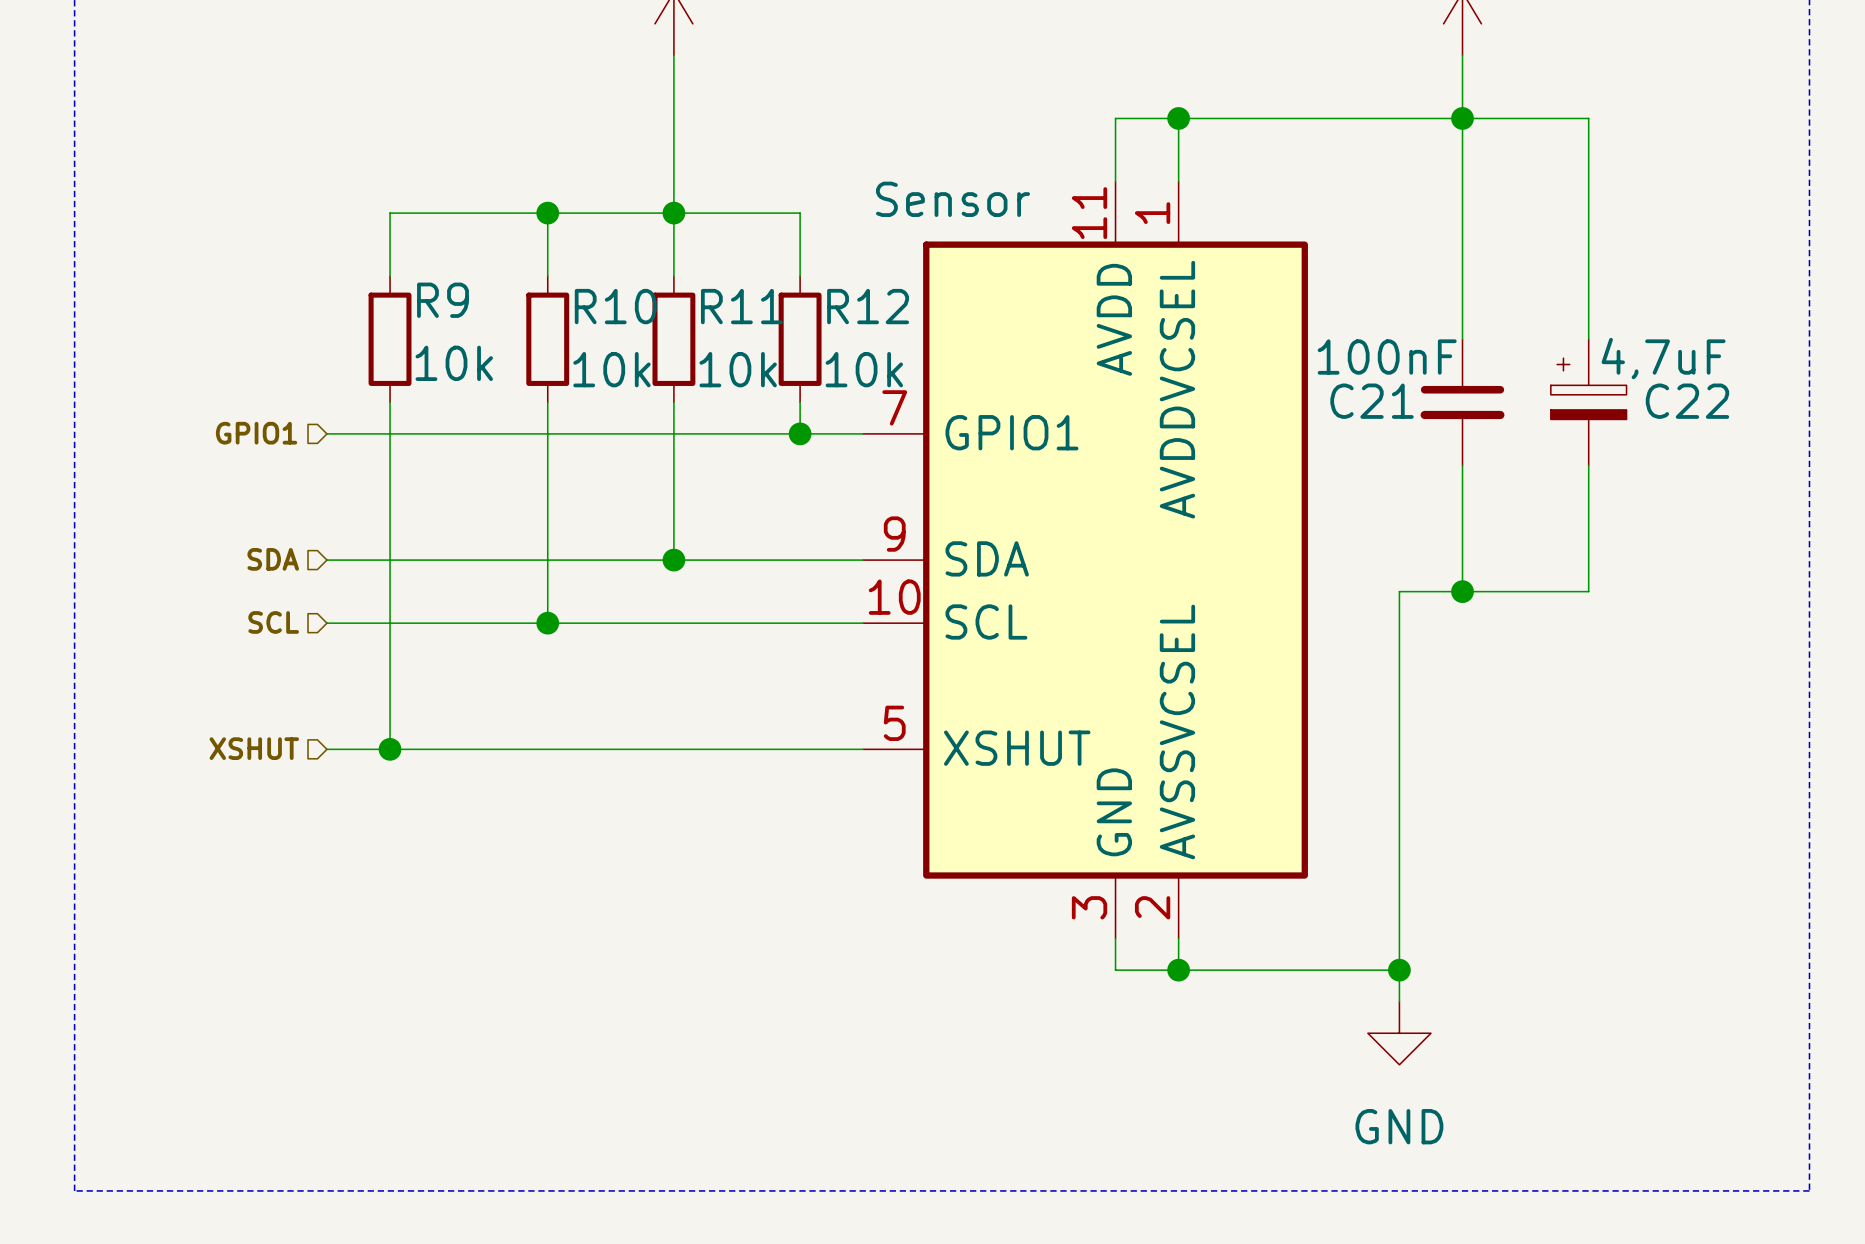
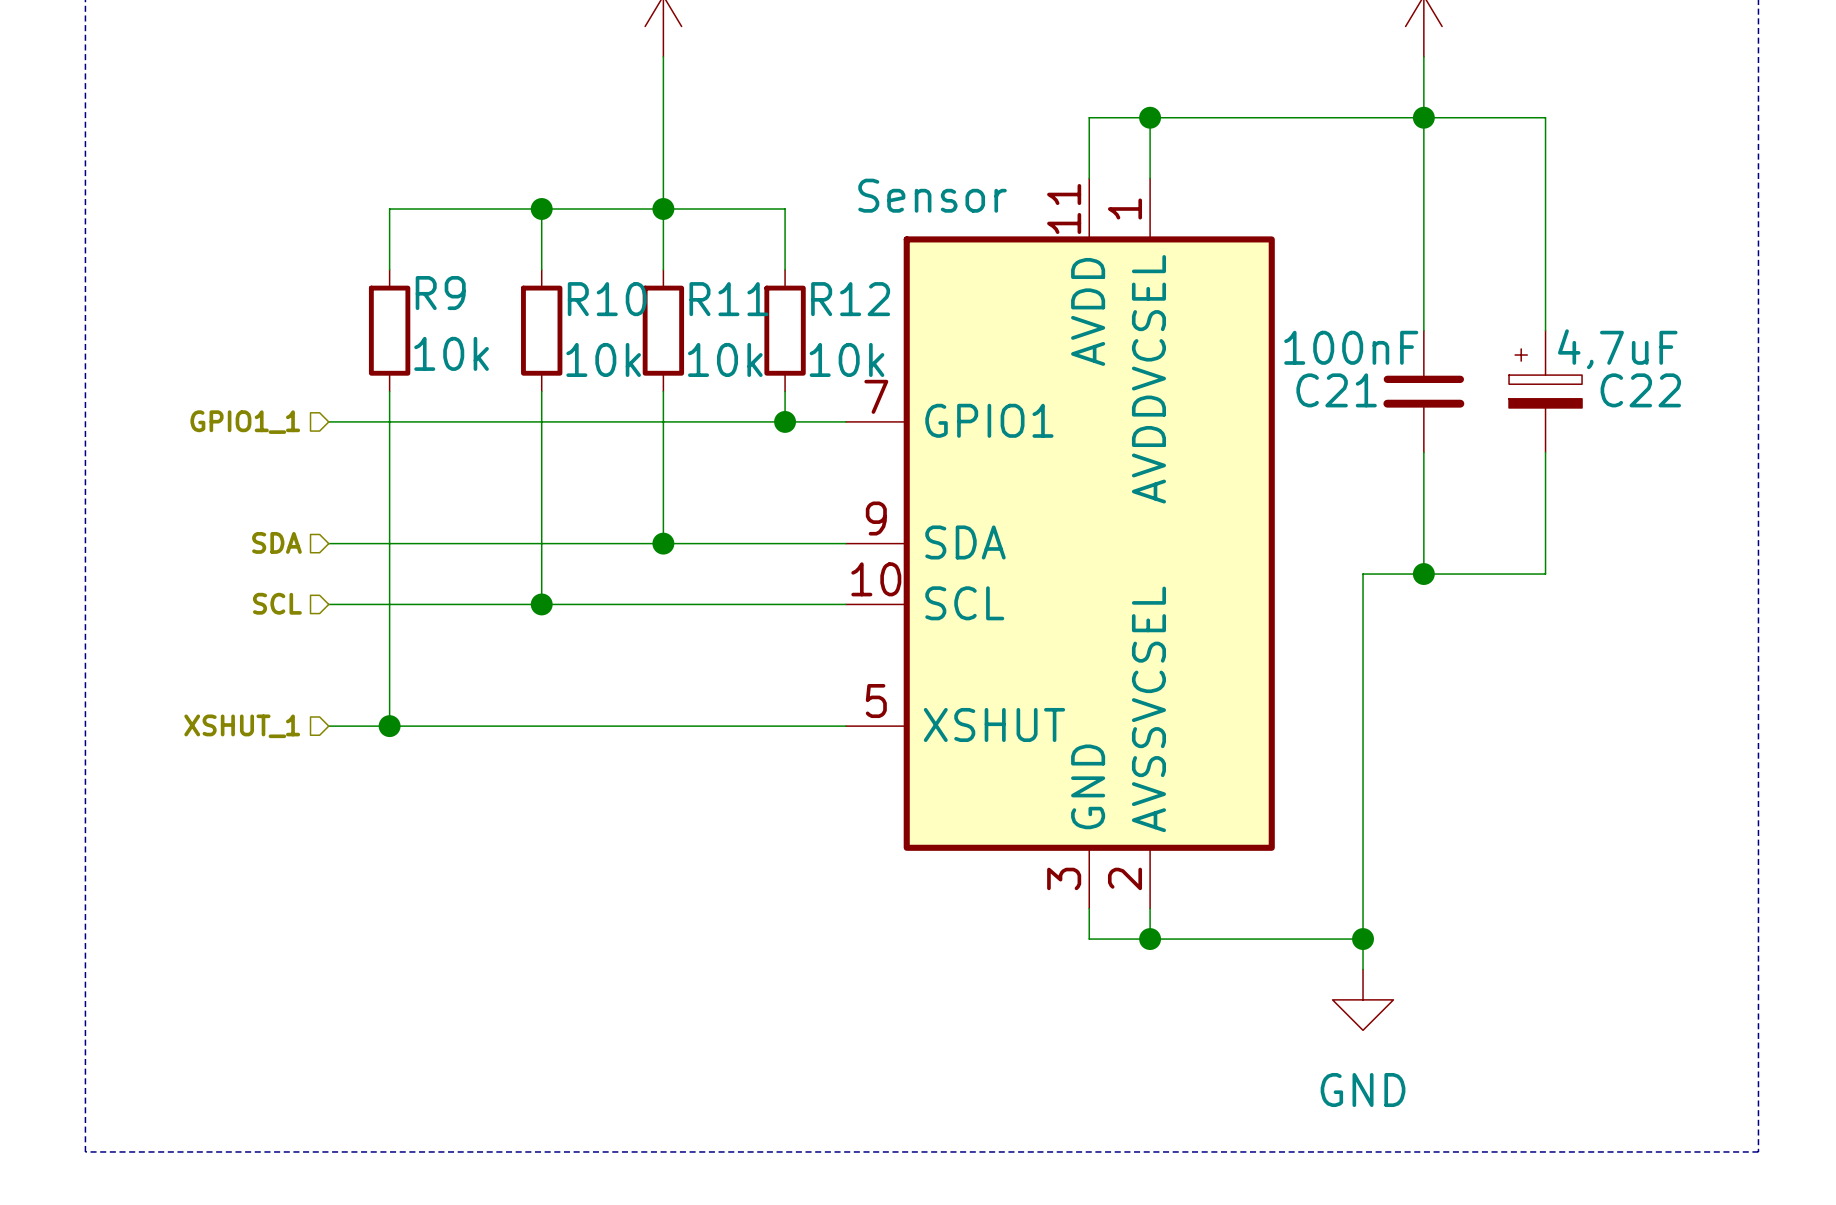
hierarchical label: GPIO1 (256, 433) -> GPIO1_1 (245, 422)
hierarchical label: XSHUT (254, 748) -> XSHUT_1 (242, 726)

